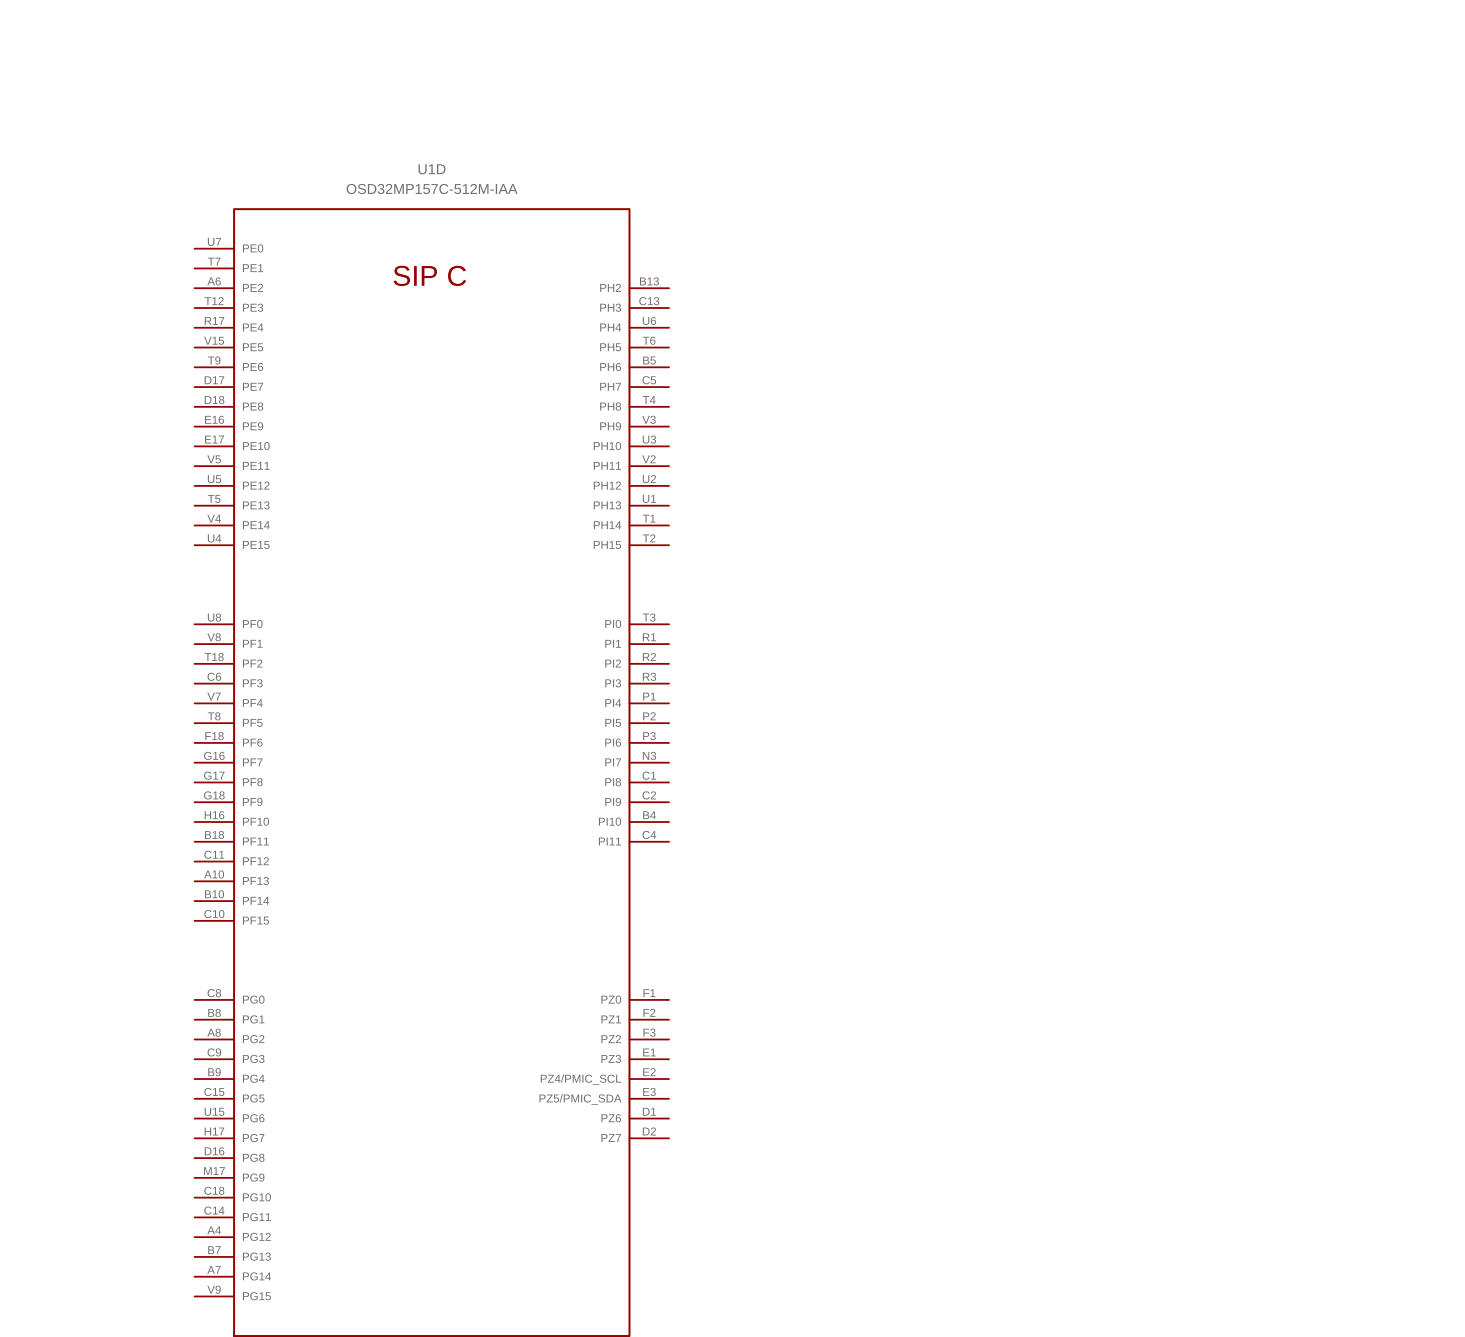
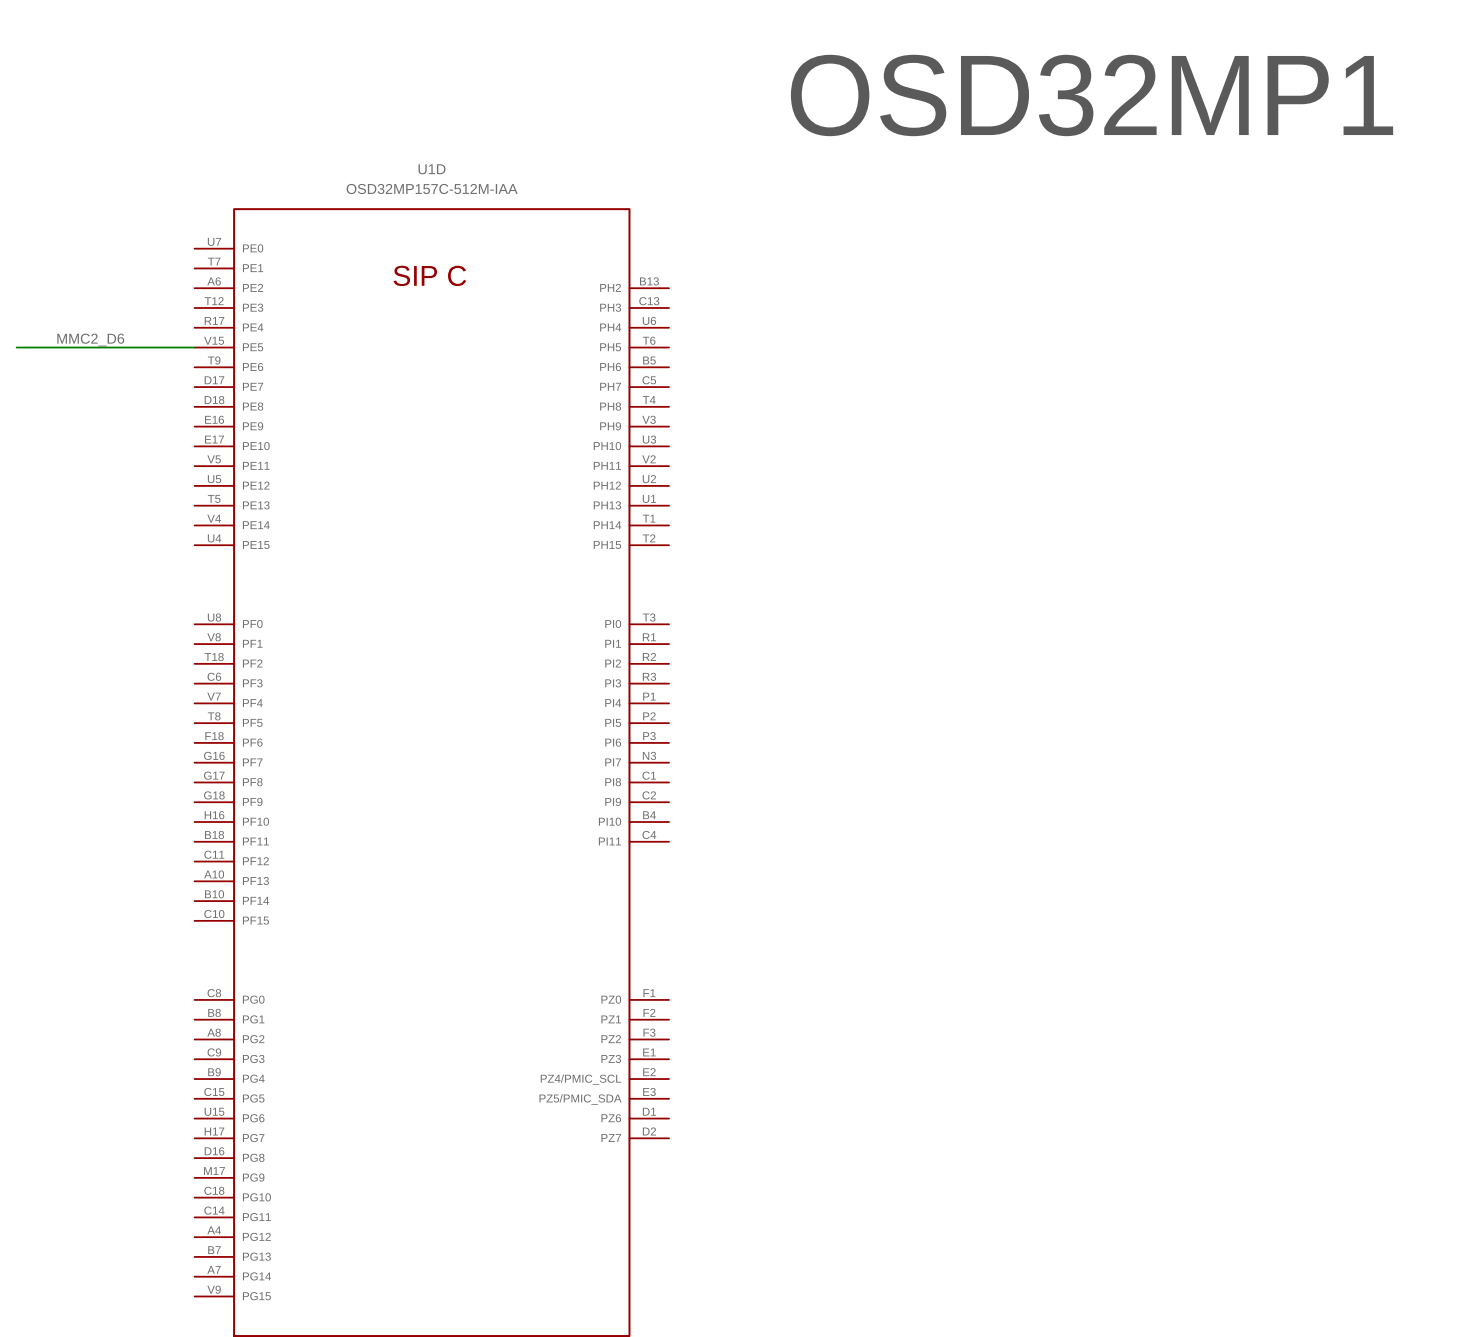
text: none -> OSD32MP1 (1092, 95)
label: none -> MMC2_D6 (90, 340)
wire: none -> (16, 347) (194, 347)

